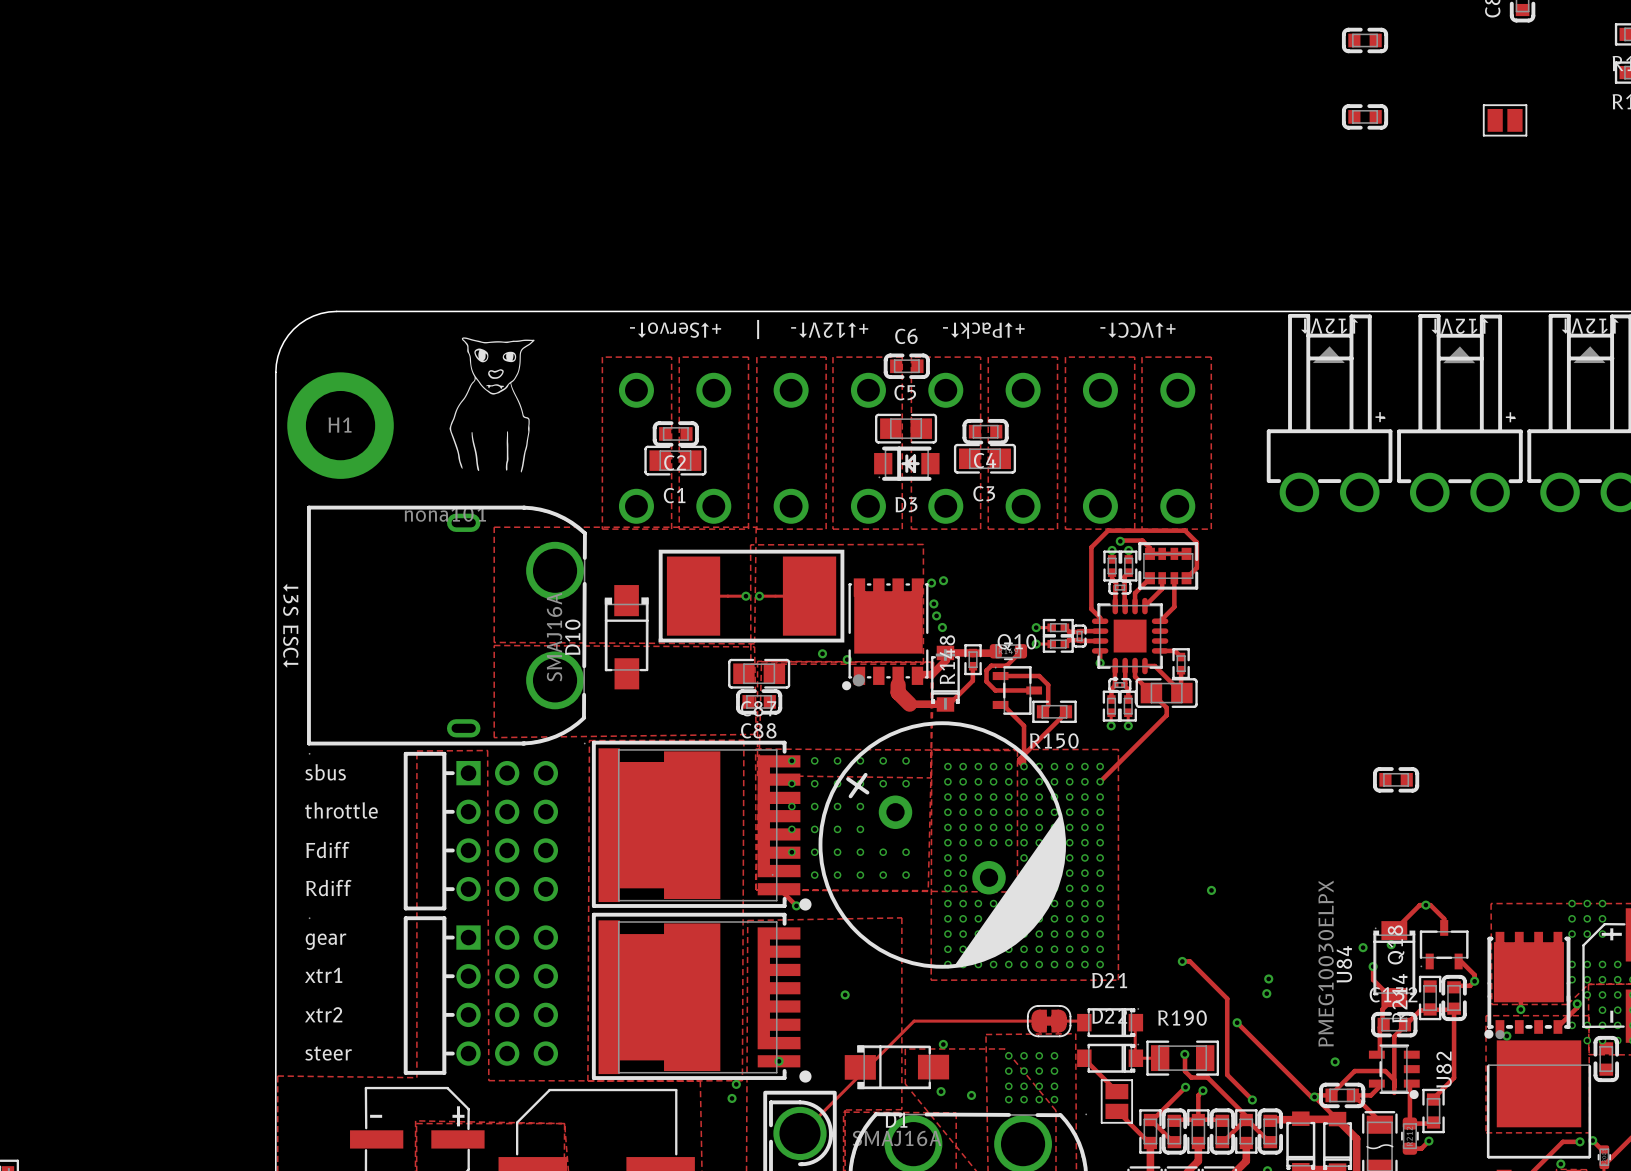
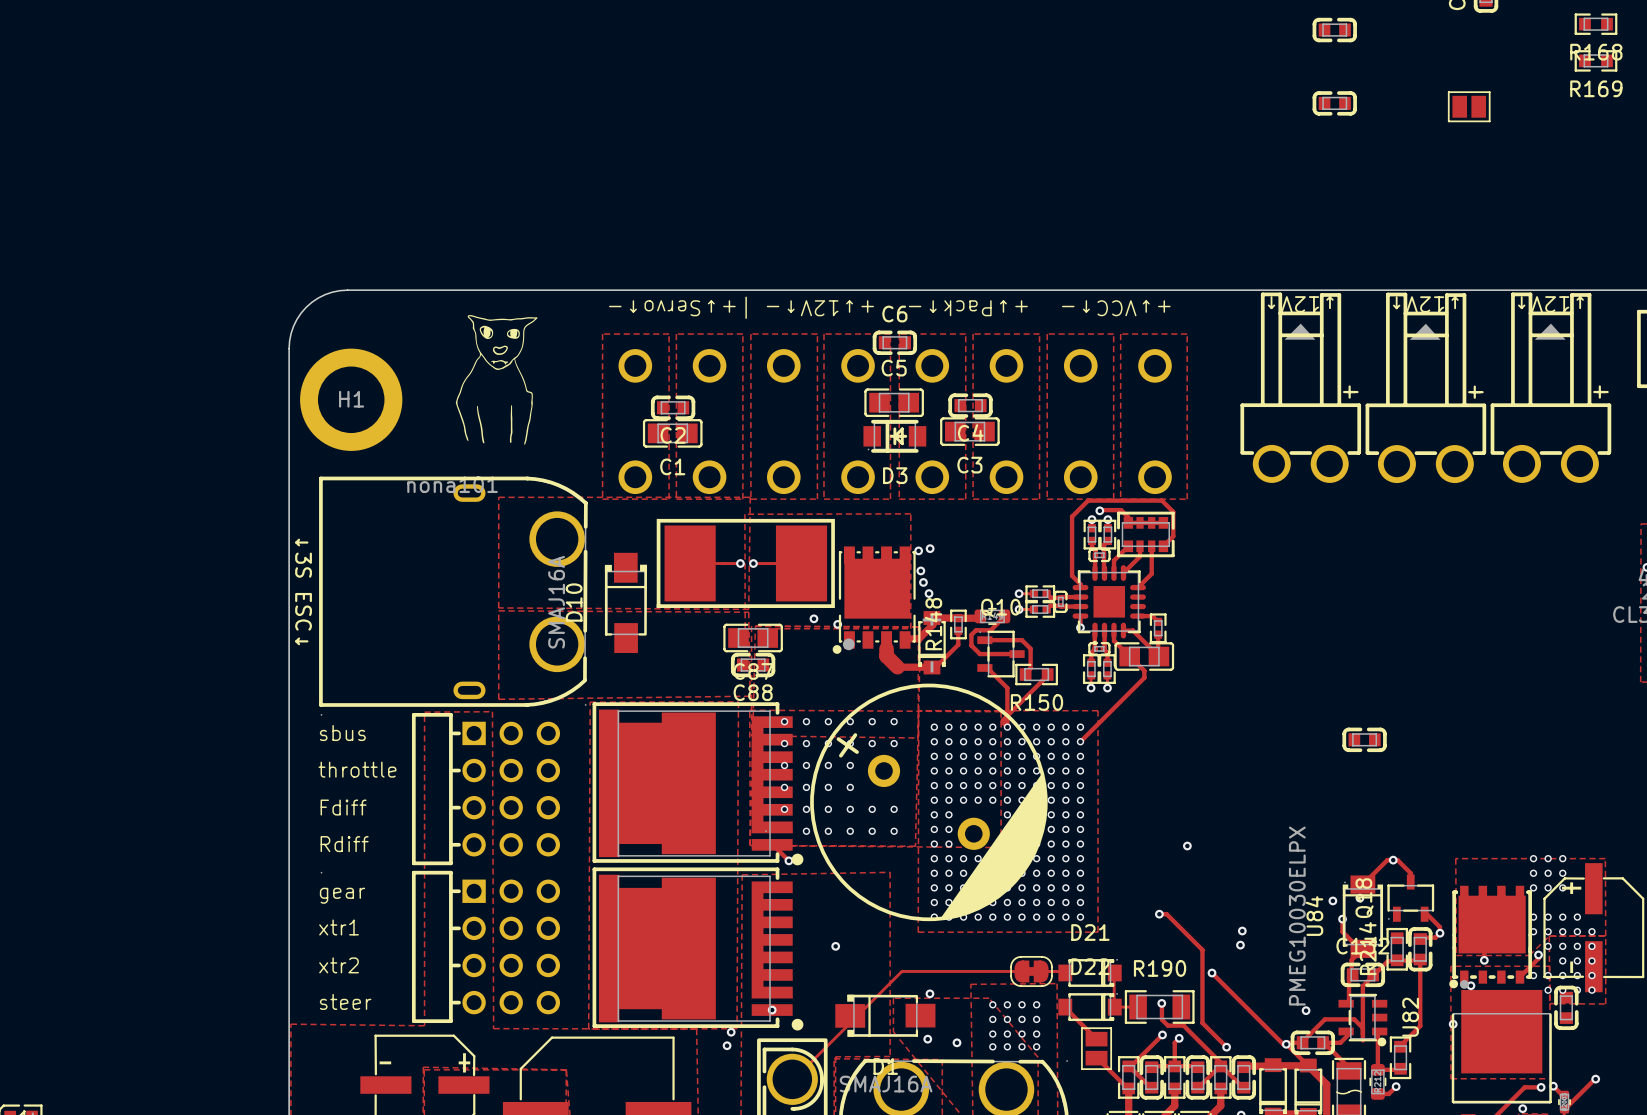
via: none -> (1453, 1024)

